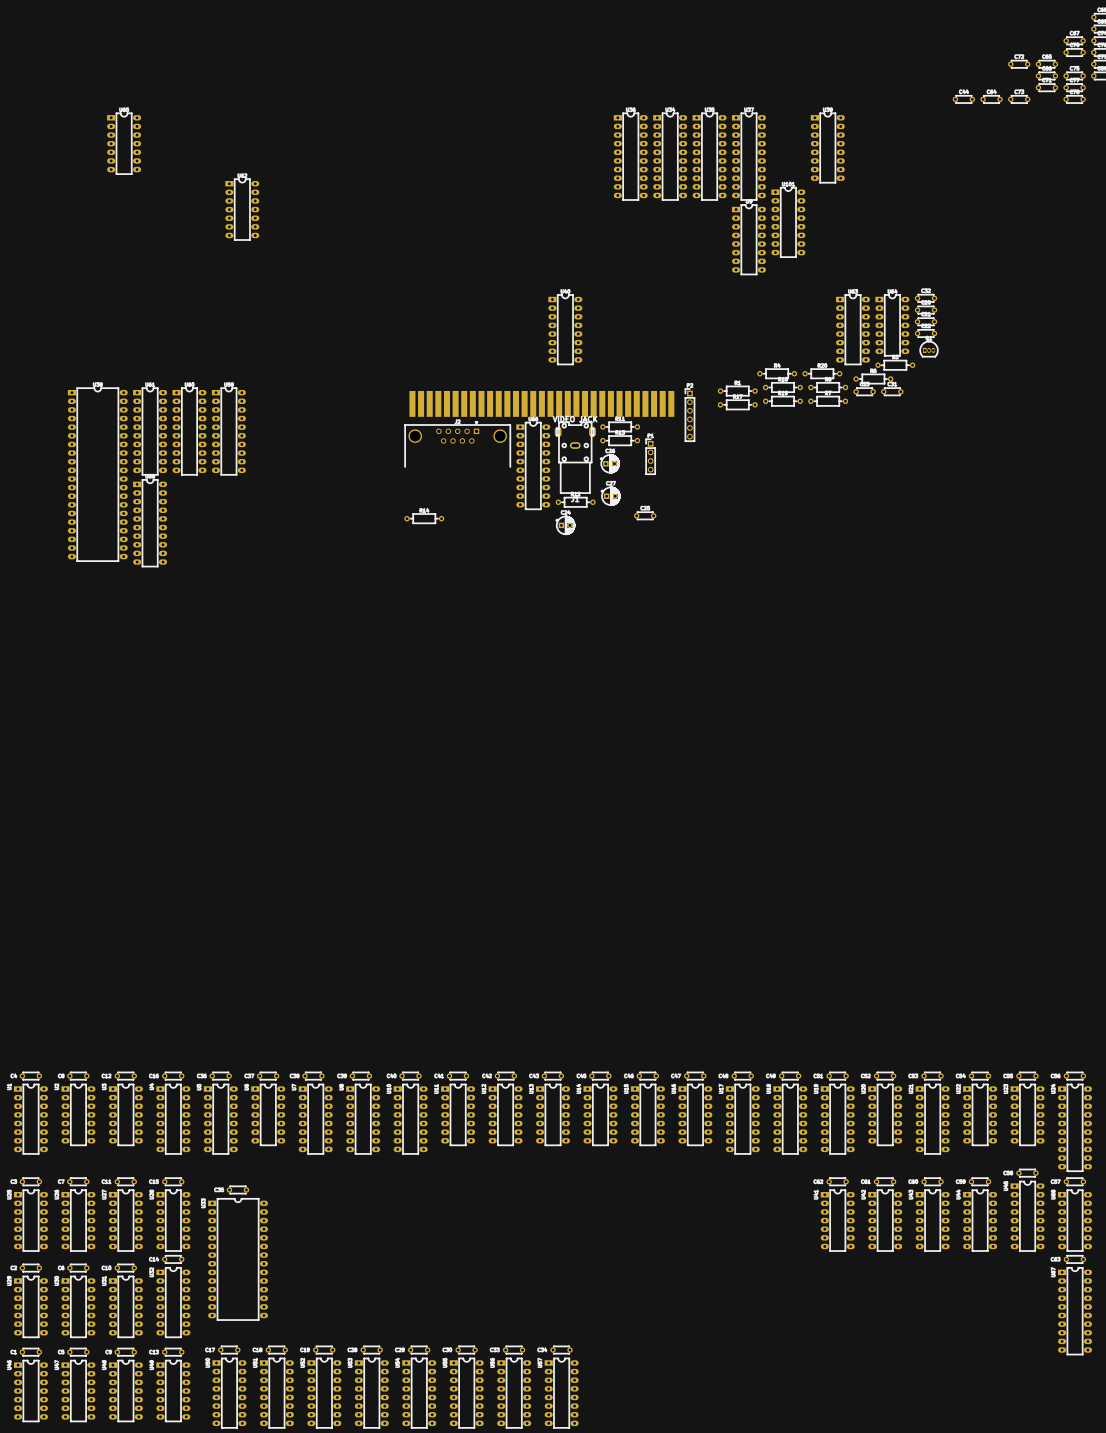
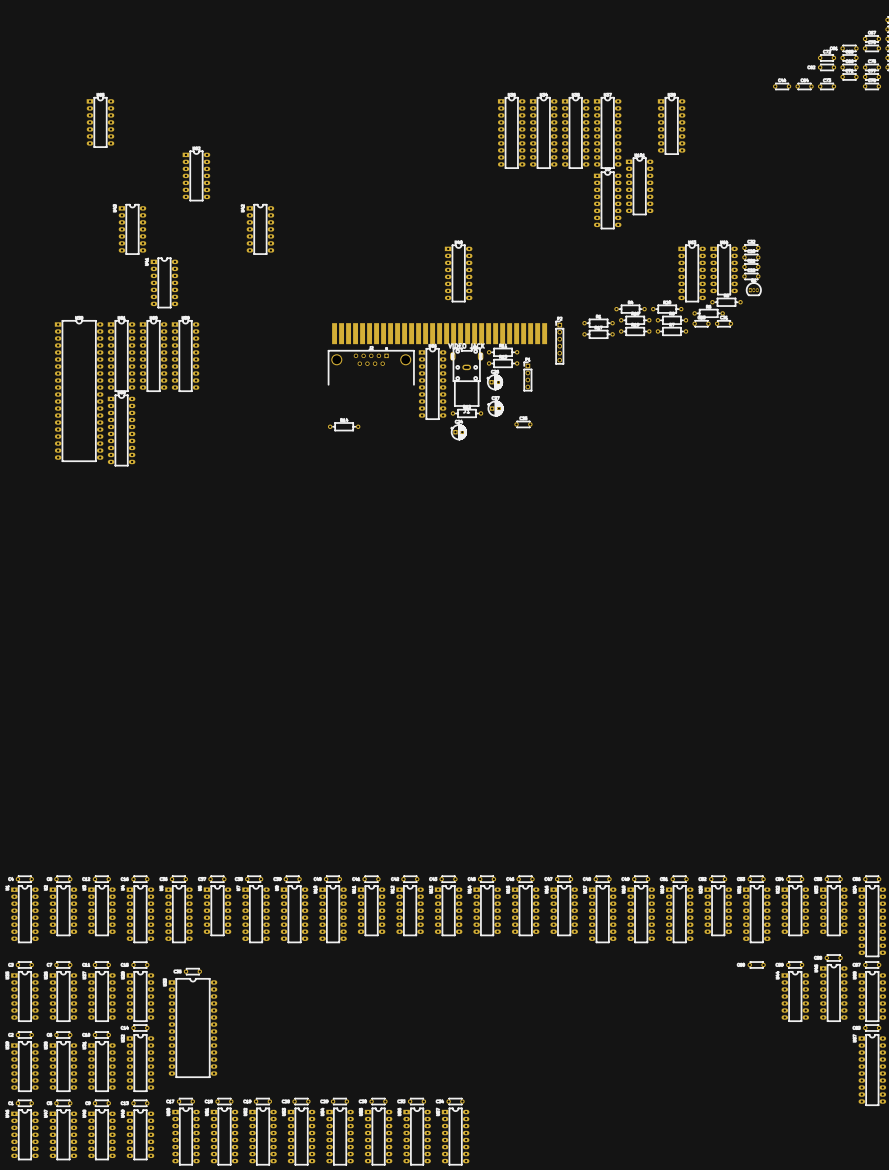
part position: (837, 1181) -> (827, 67)
part position: (885, 1181) -> (849, 48)
part position: (837, 1220) -> (164, 282)
part position: (885, 1220) -> (260, 229)
part position: (932, 1220) -> (132, 229)

